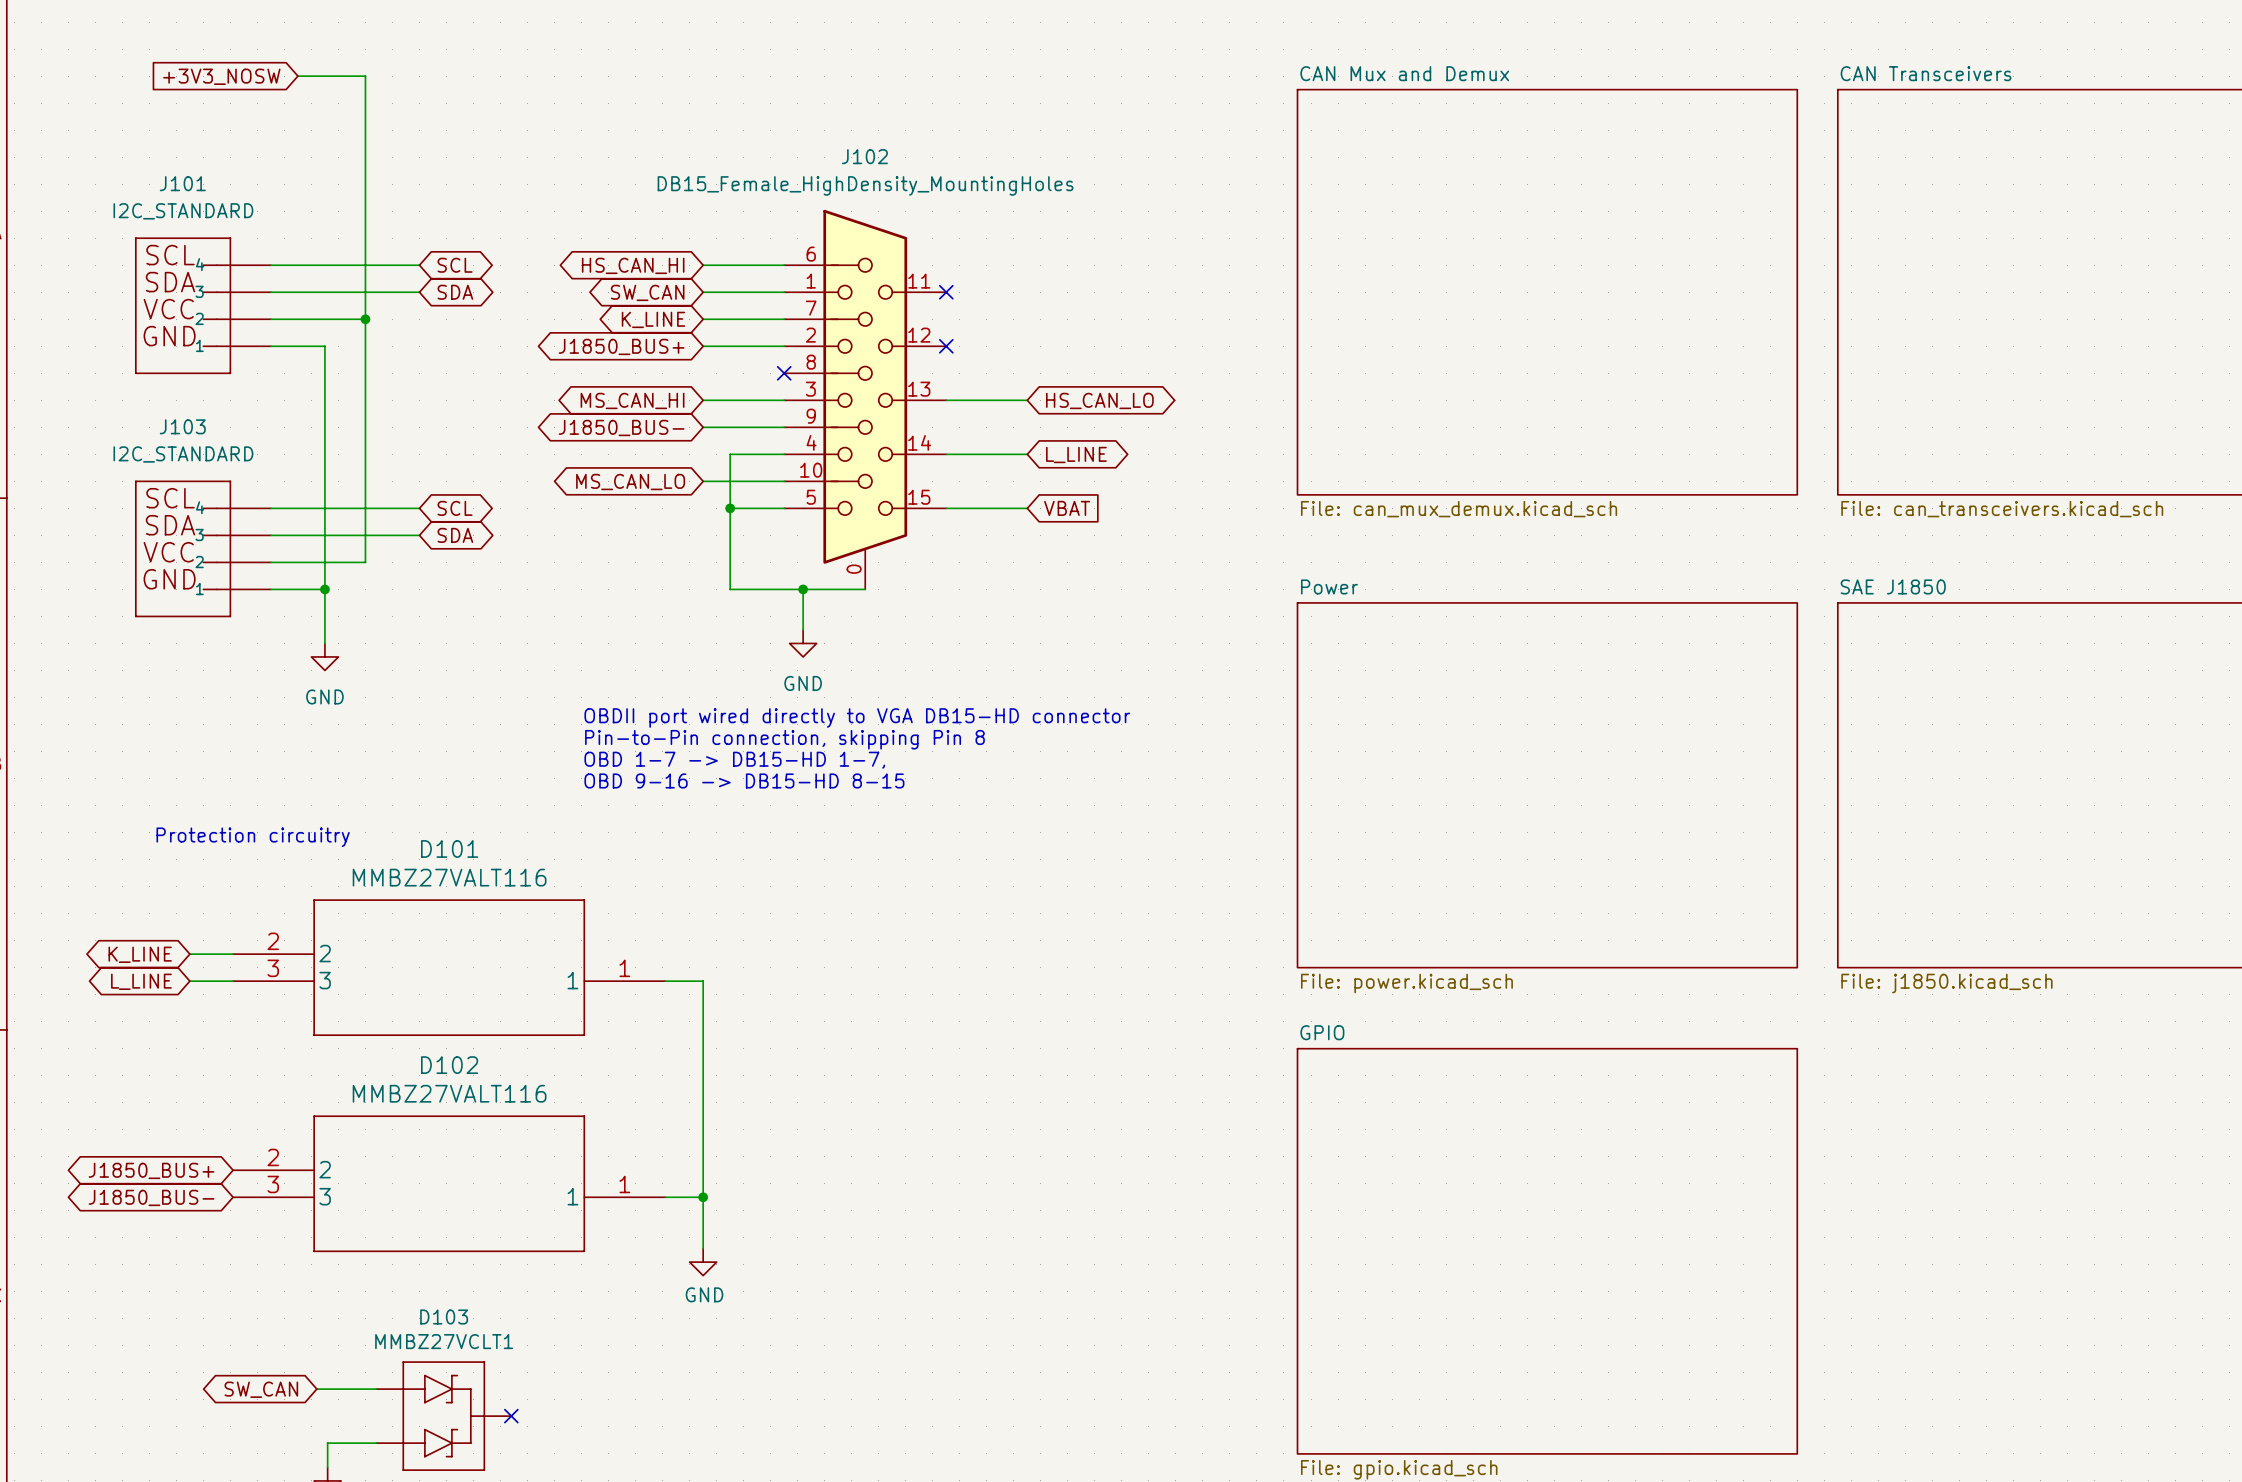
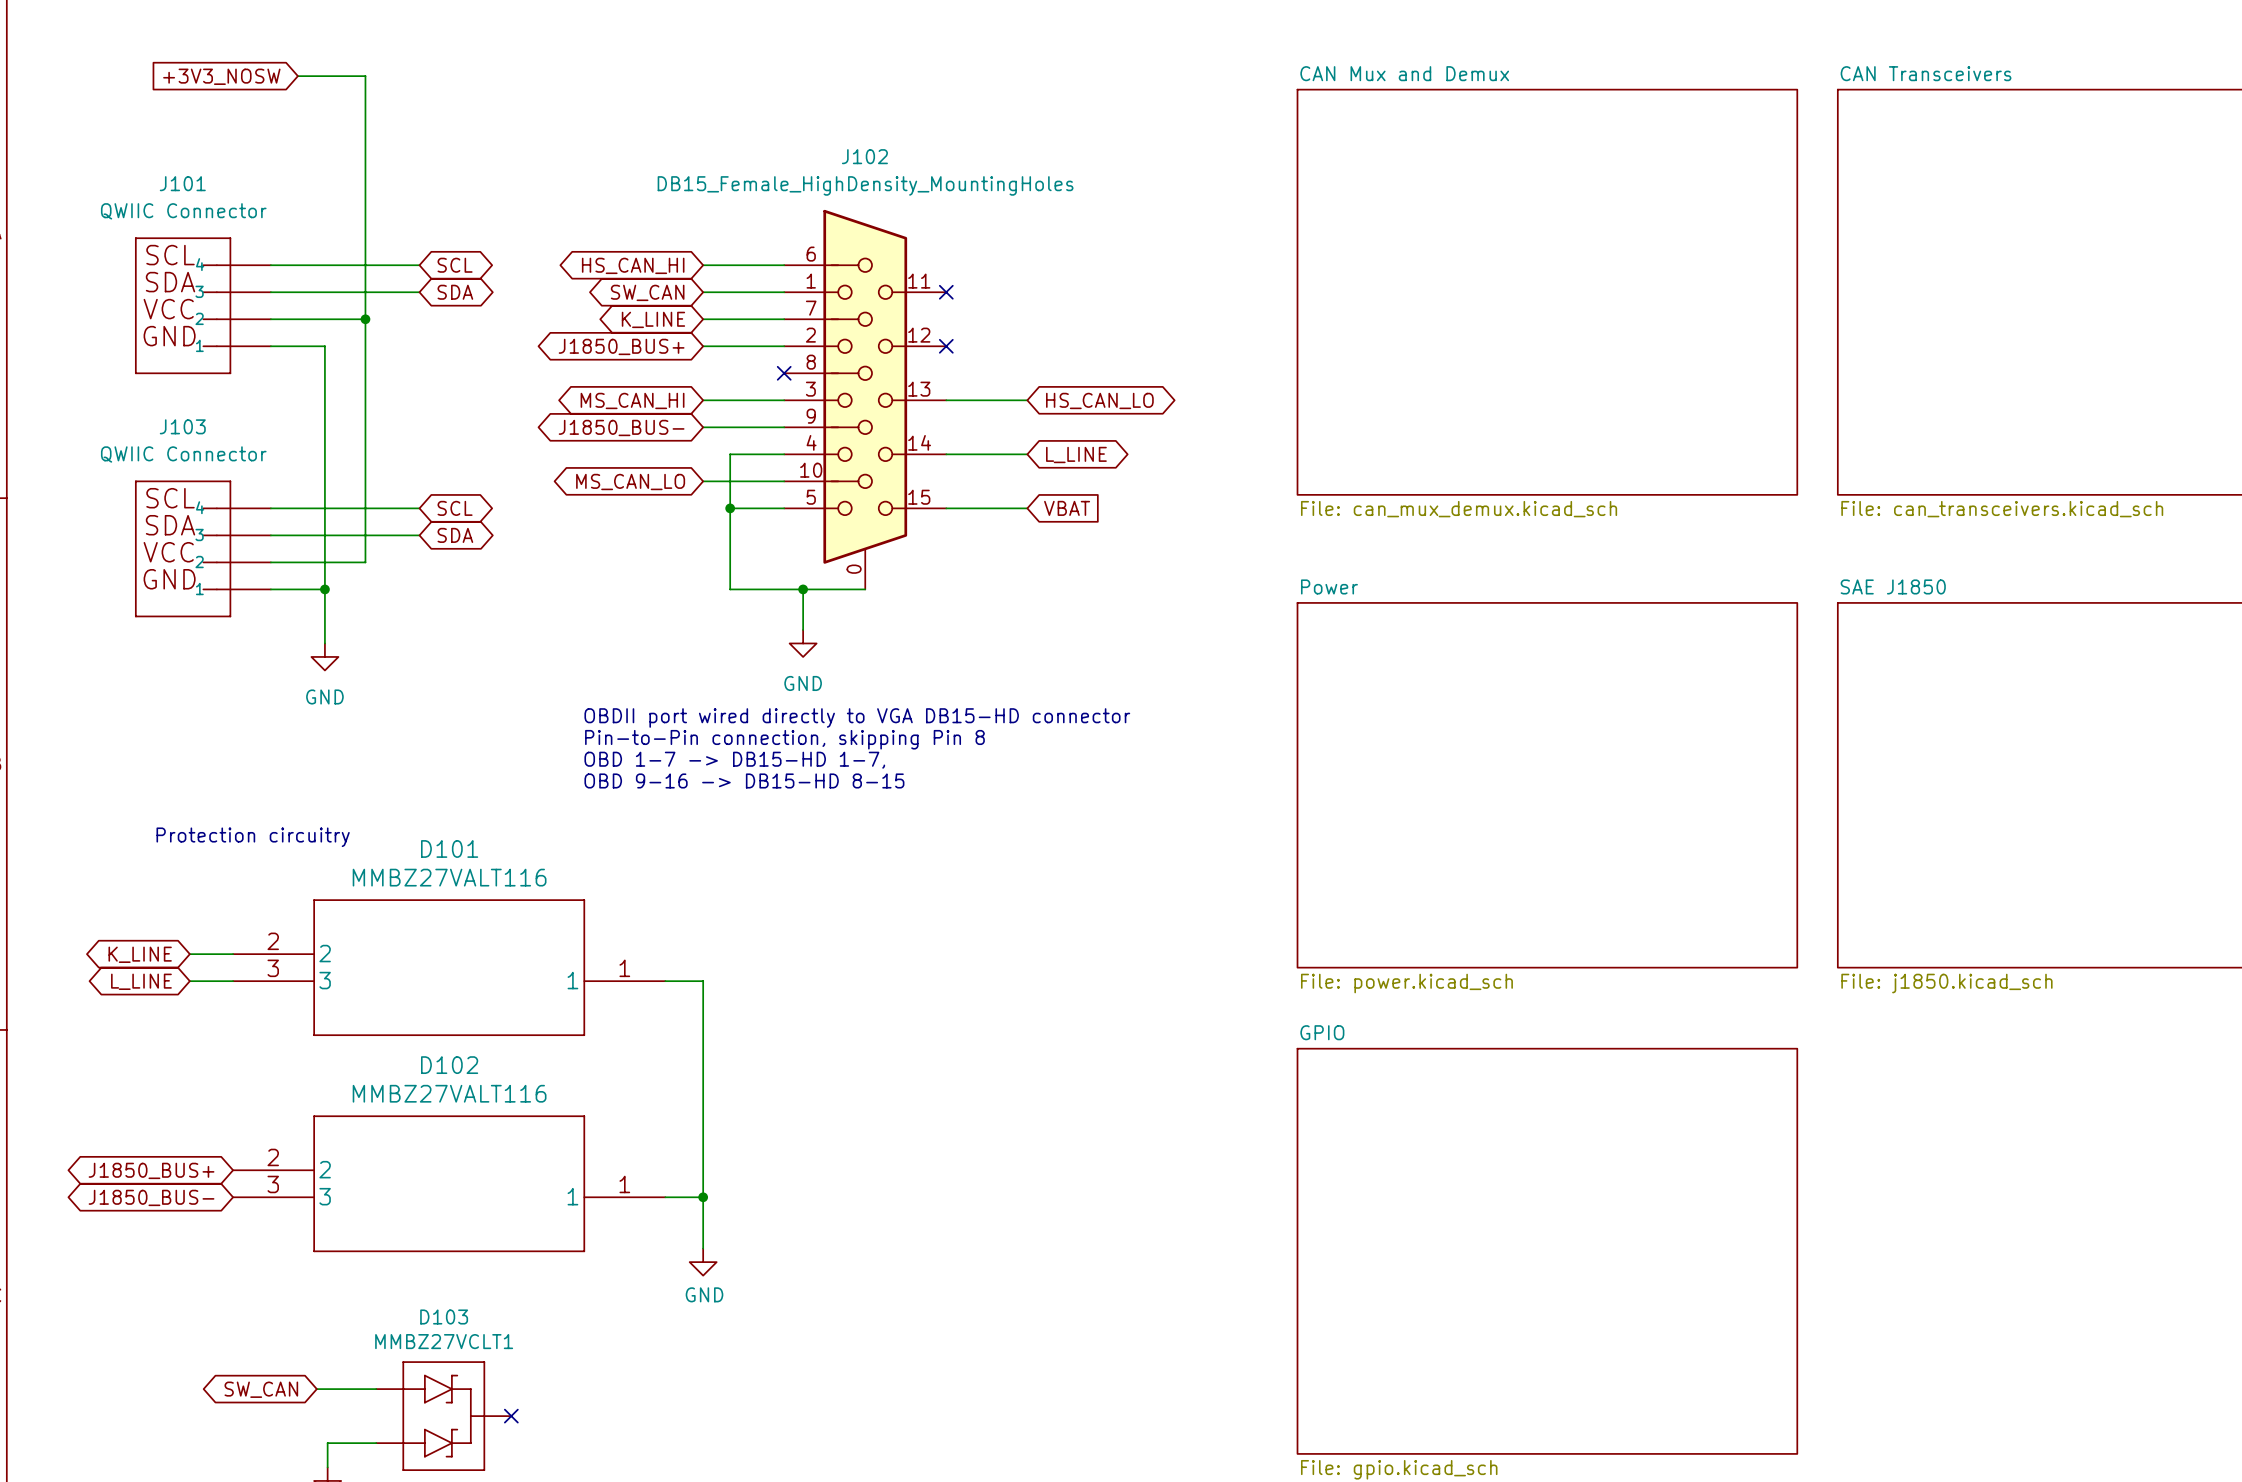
J101 value: I2C_STANDARD (183, 211) -> QWIIC Connector (183, 211)
J103 value: I2C_STANDARD (183, 454) -> QWIIC Connector (183, 454)

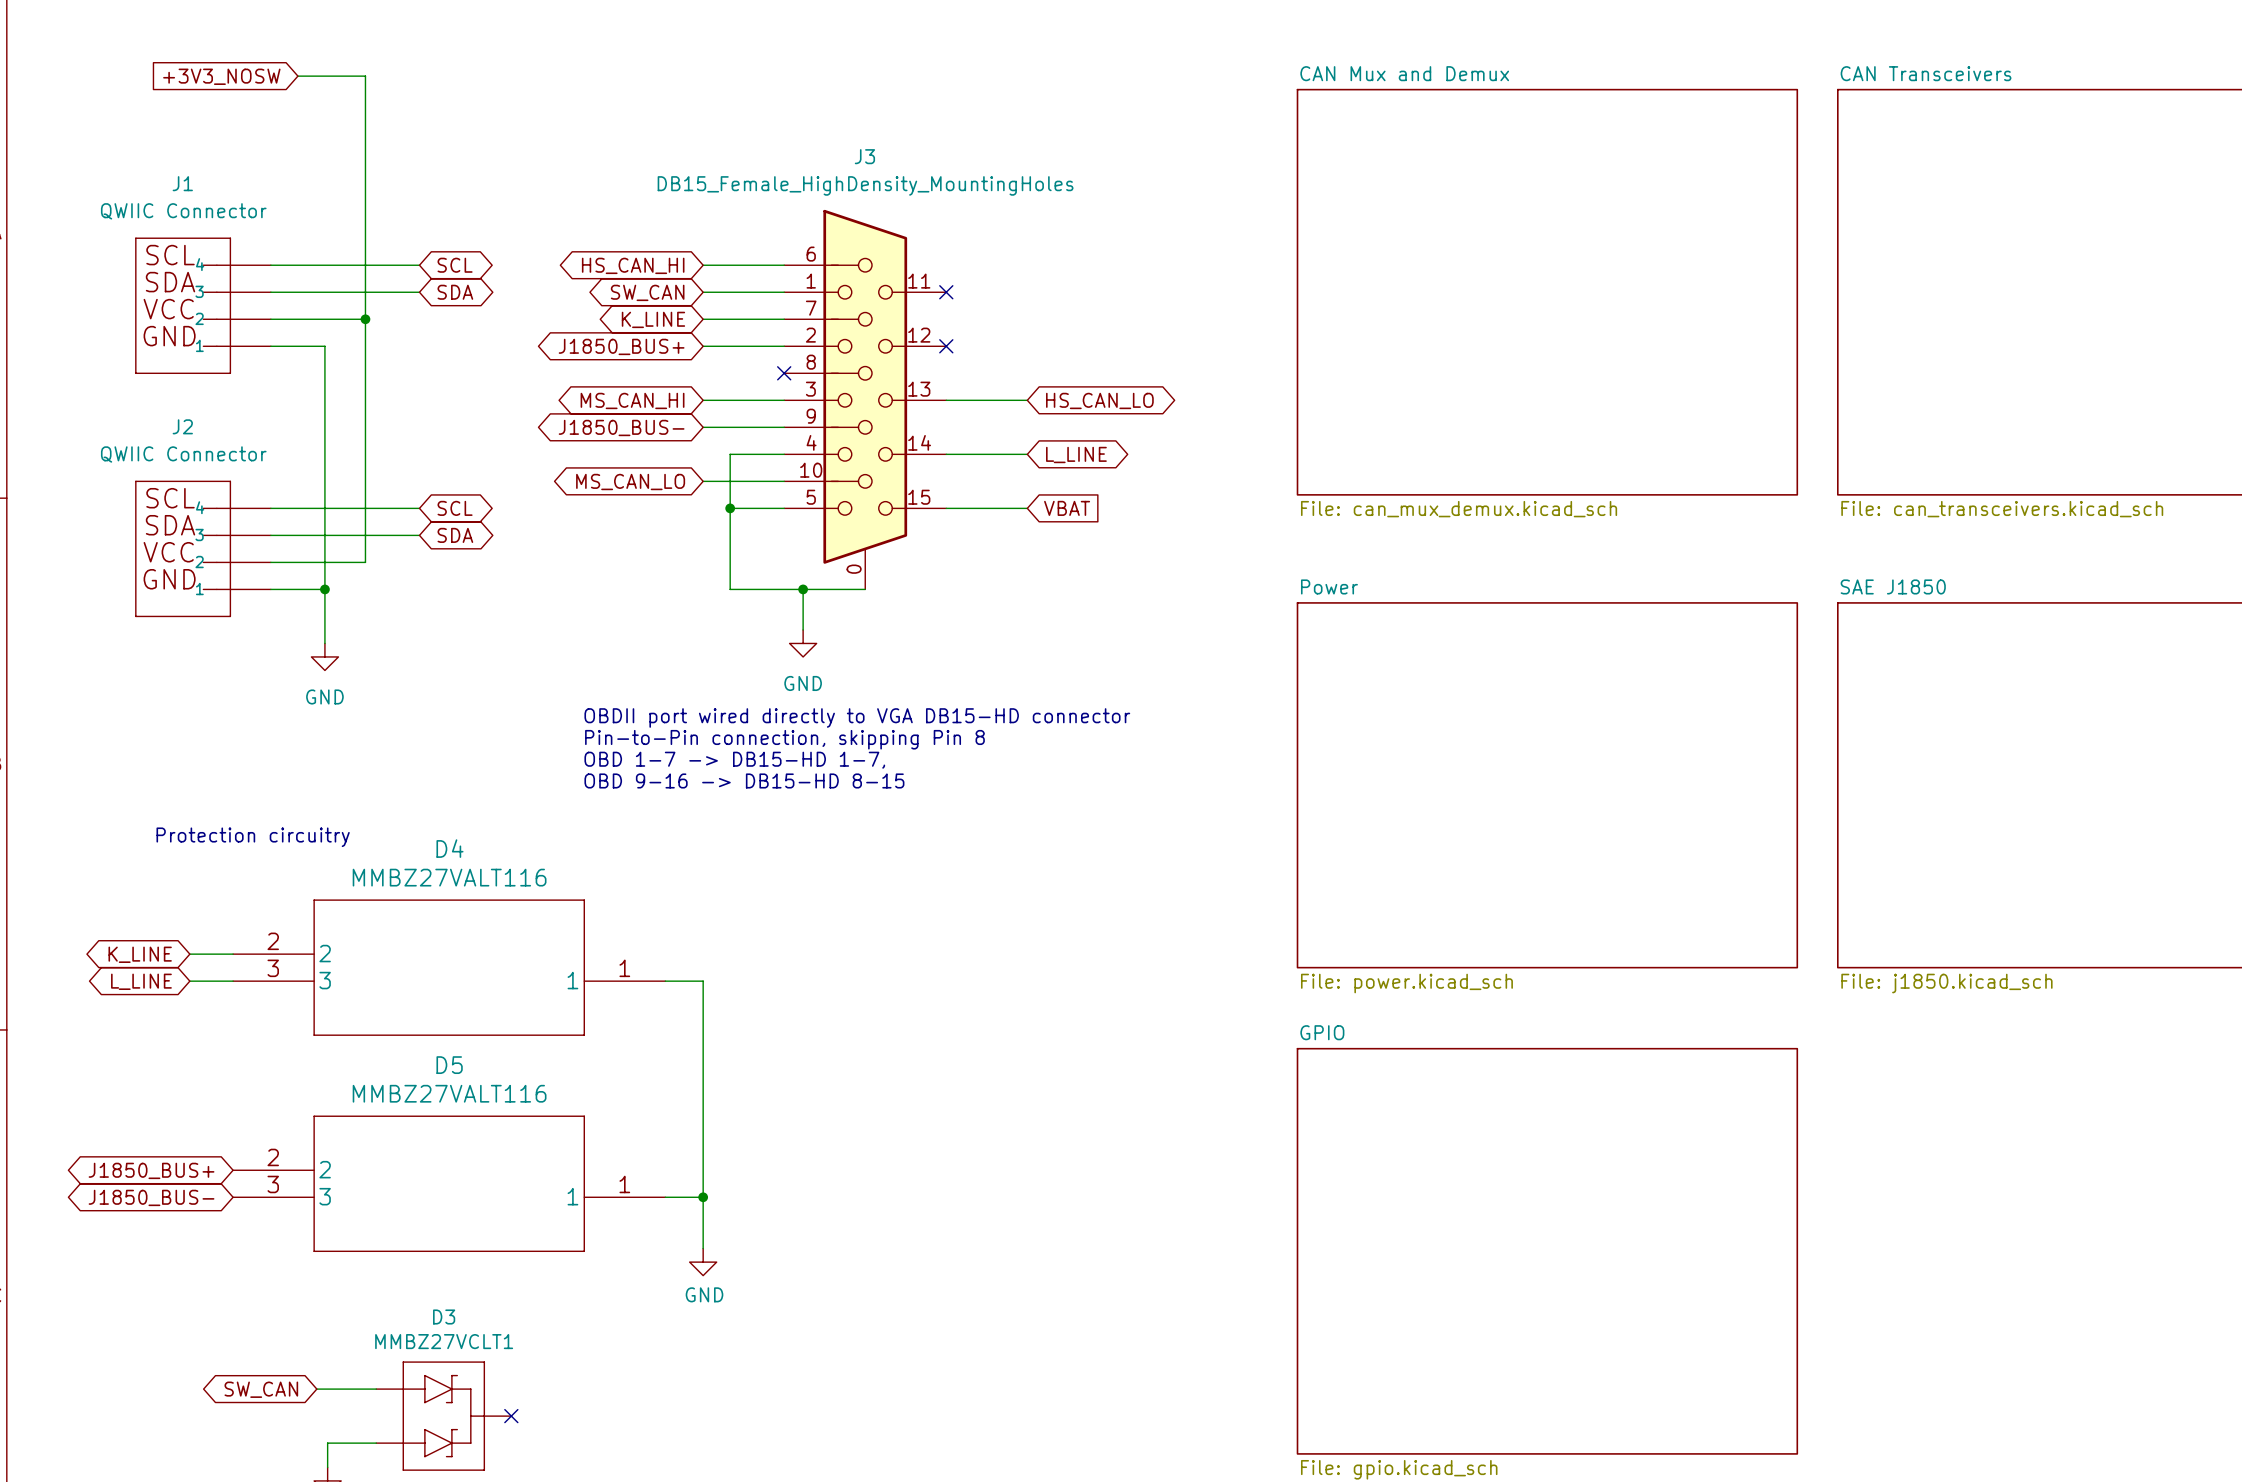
J102 name: J102 (864, 156) -> J3 (864, 156)
J101 name: J101 (182, 183) -> J1 (182, 183)
J103 name: J103 (182, 426) -> J2 (182, 426)
D101 name: D101 (449, 848) -> D4 (449, 848)
D102 name: D102 (449, 1065) -> D5 (449, 1065)
D103 name: D103 (444, 1316) -> D3 (444, 1316)

